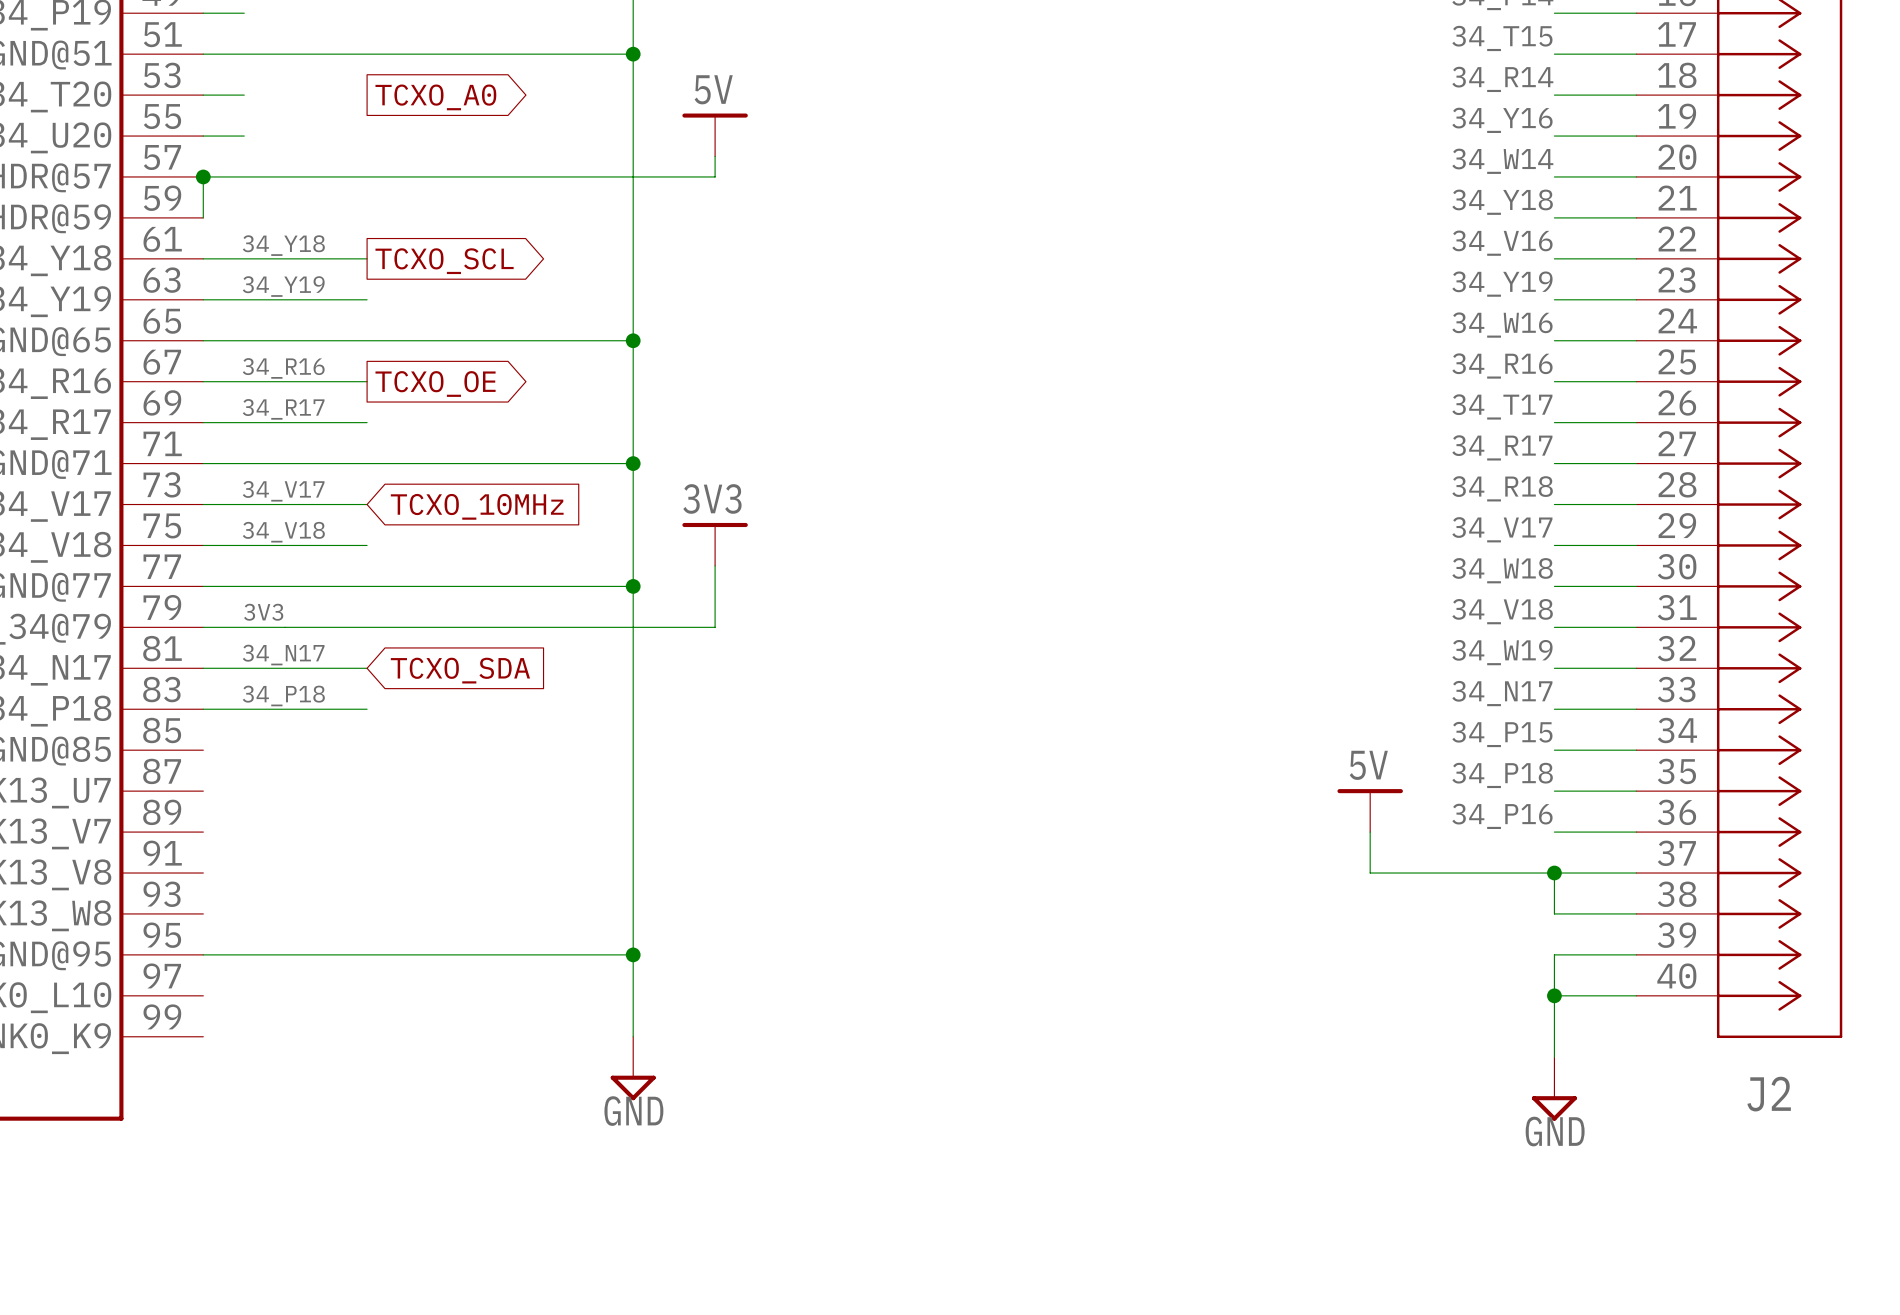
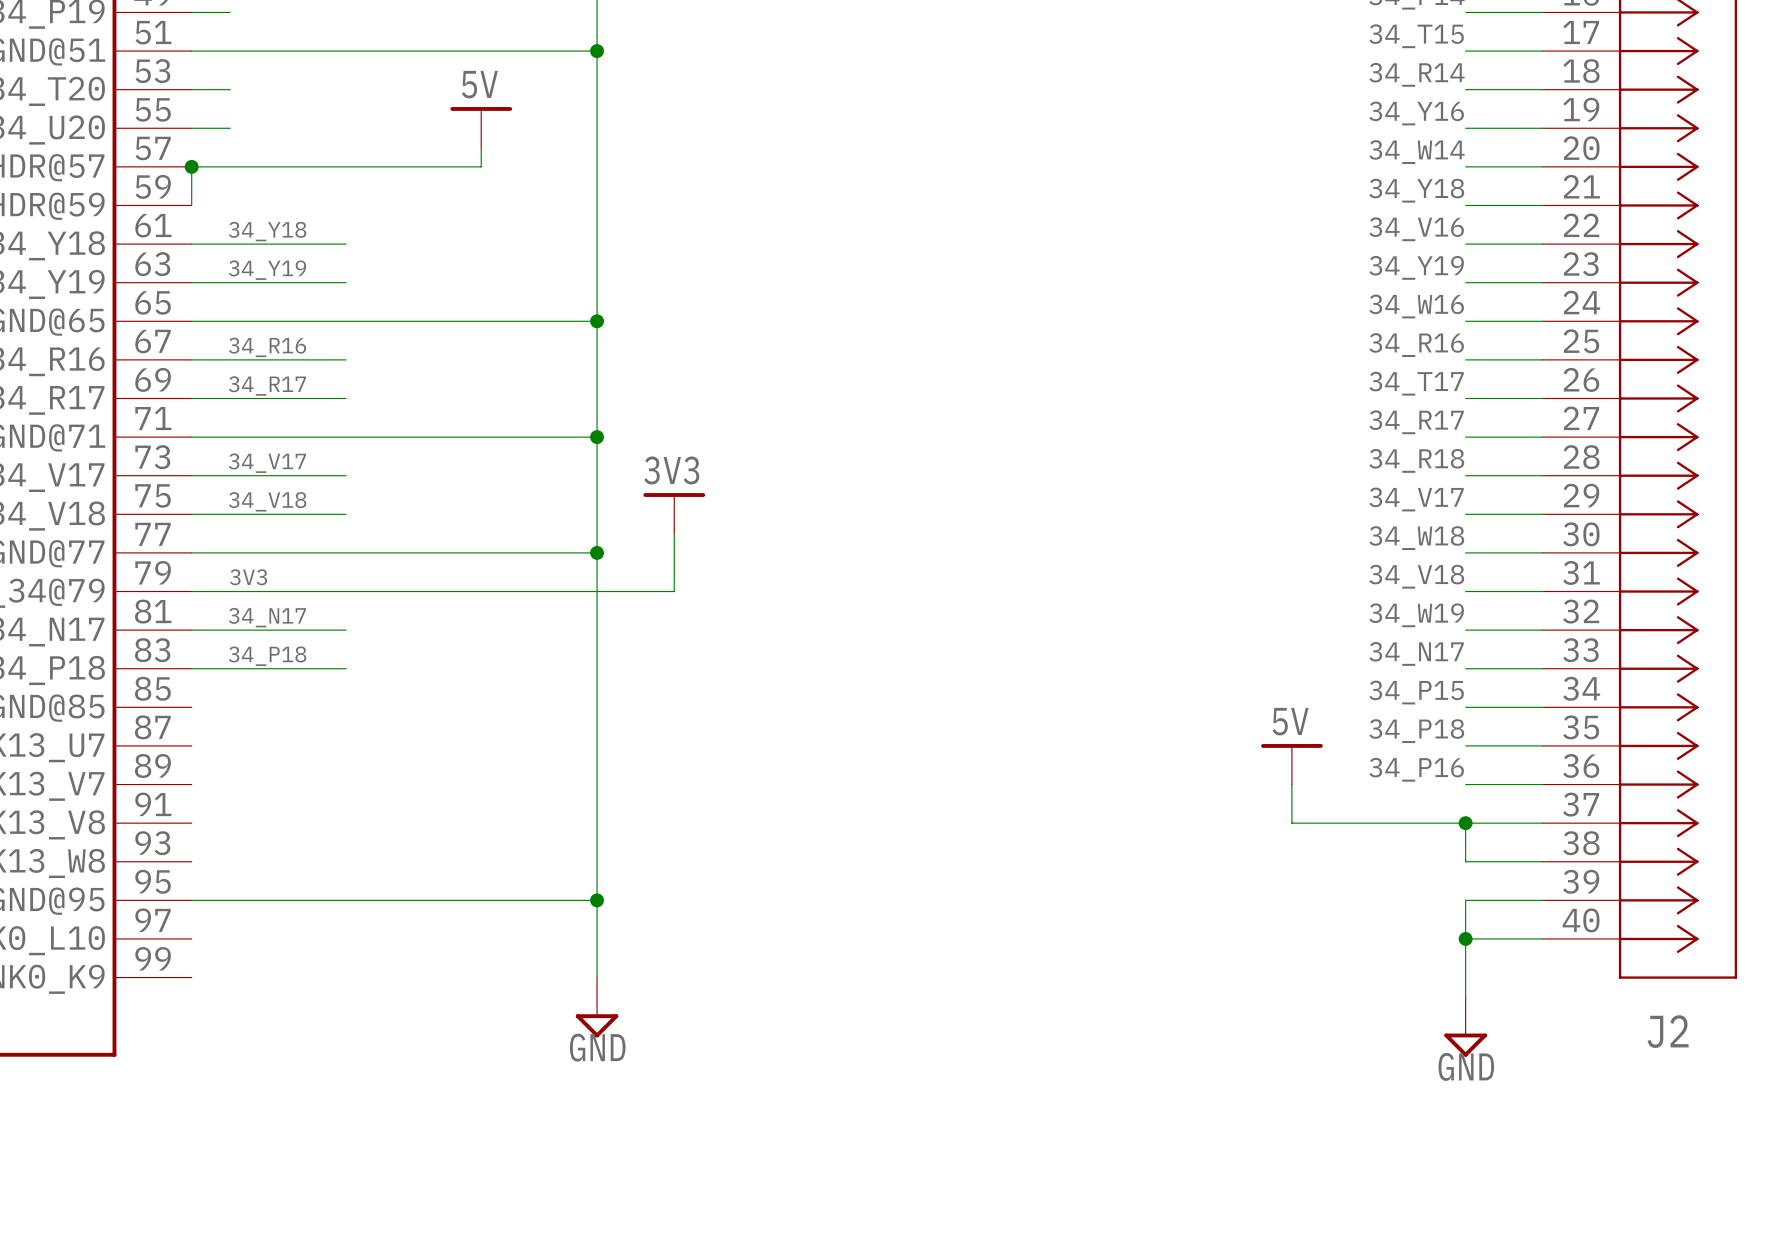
global label: TCXO_A0 (435, 97) -> none
power symbol position: 5V (715, 135) -> 5V (481, 127)
wire: (715, 156) (715, 176) (510, 176) -> (481, 147) (481, 166)
global label: TCXO_SCL (444, 261) -> none
global label: TCXO_OE (435, 383) -> none
global label: TCXO_10MHz (477, 506) -> none
global label: TCXO_SDA (460, 670) -> none

